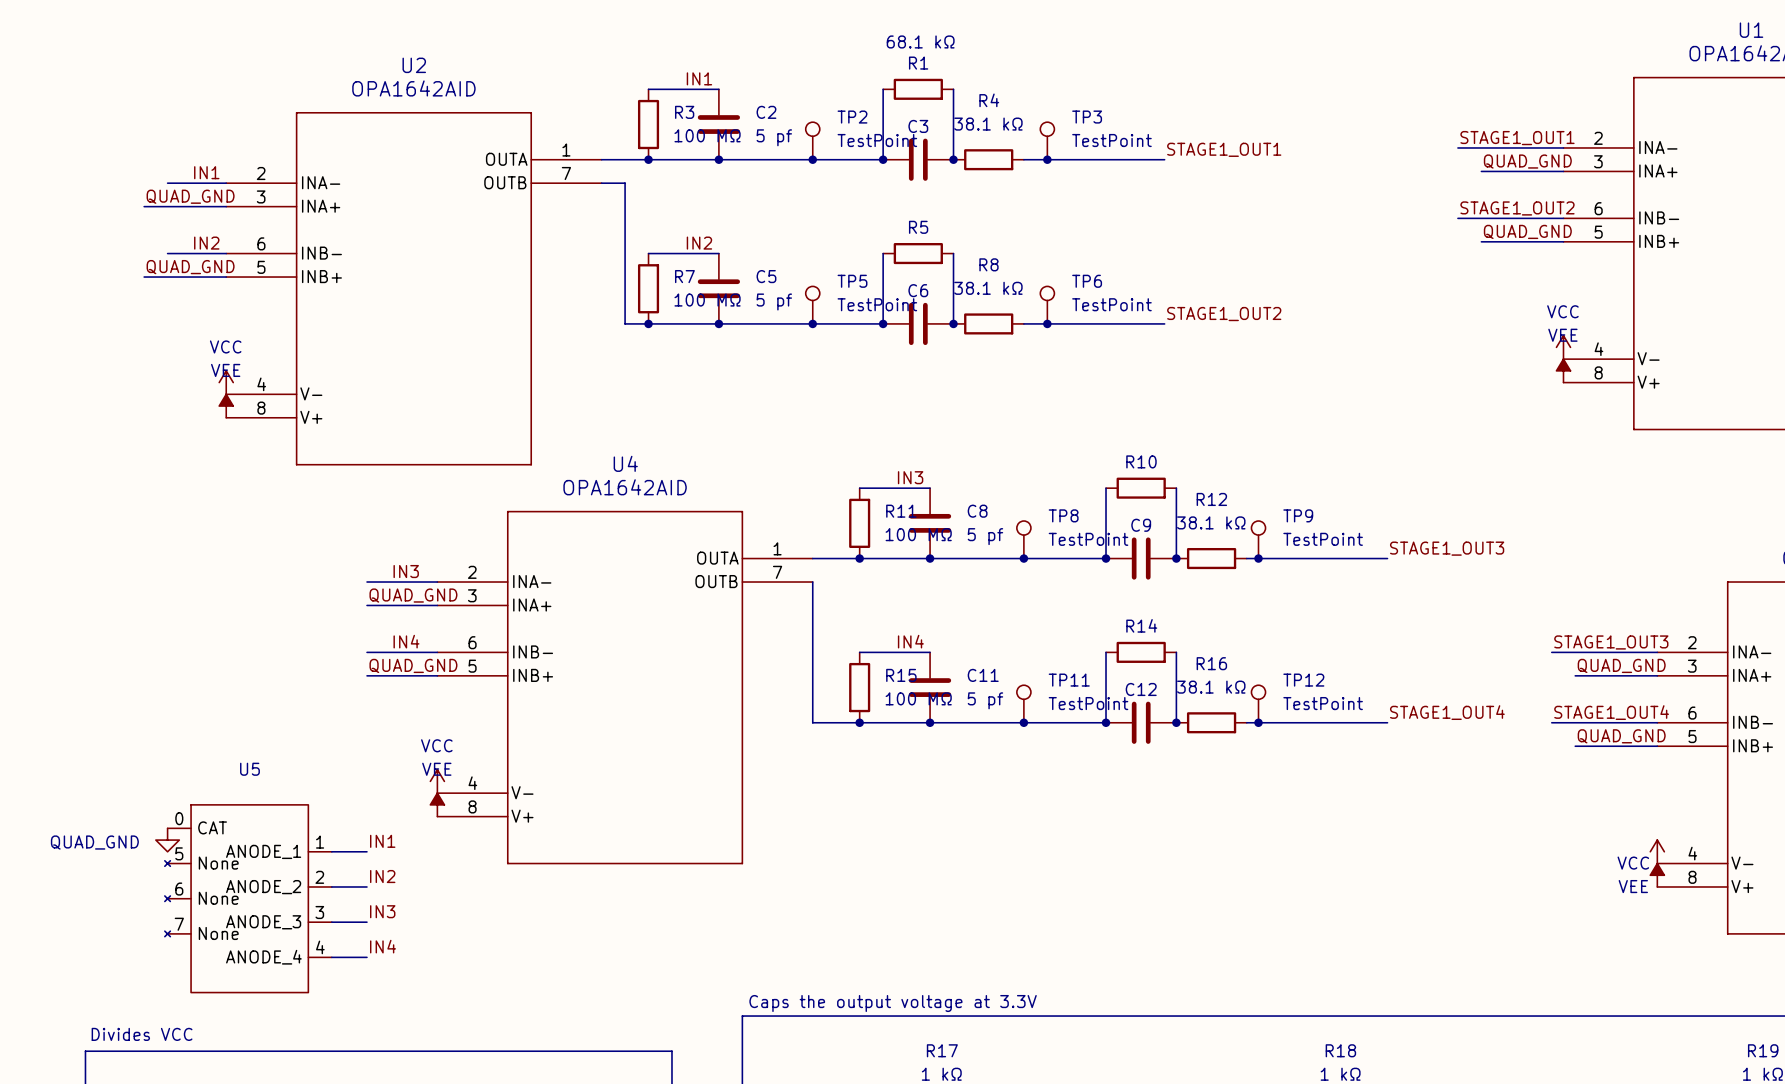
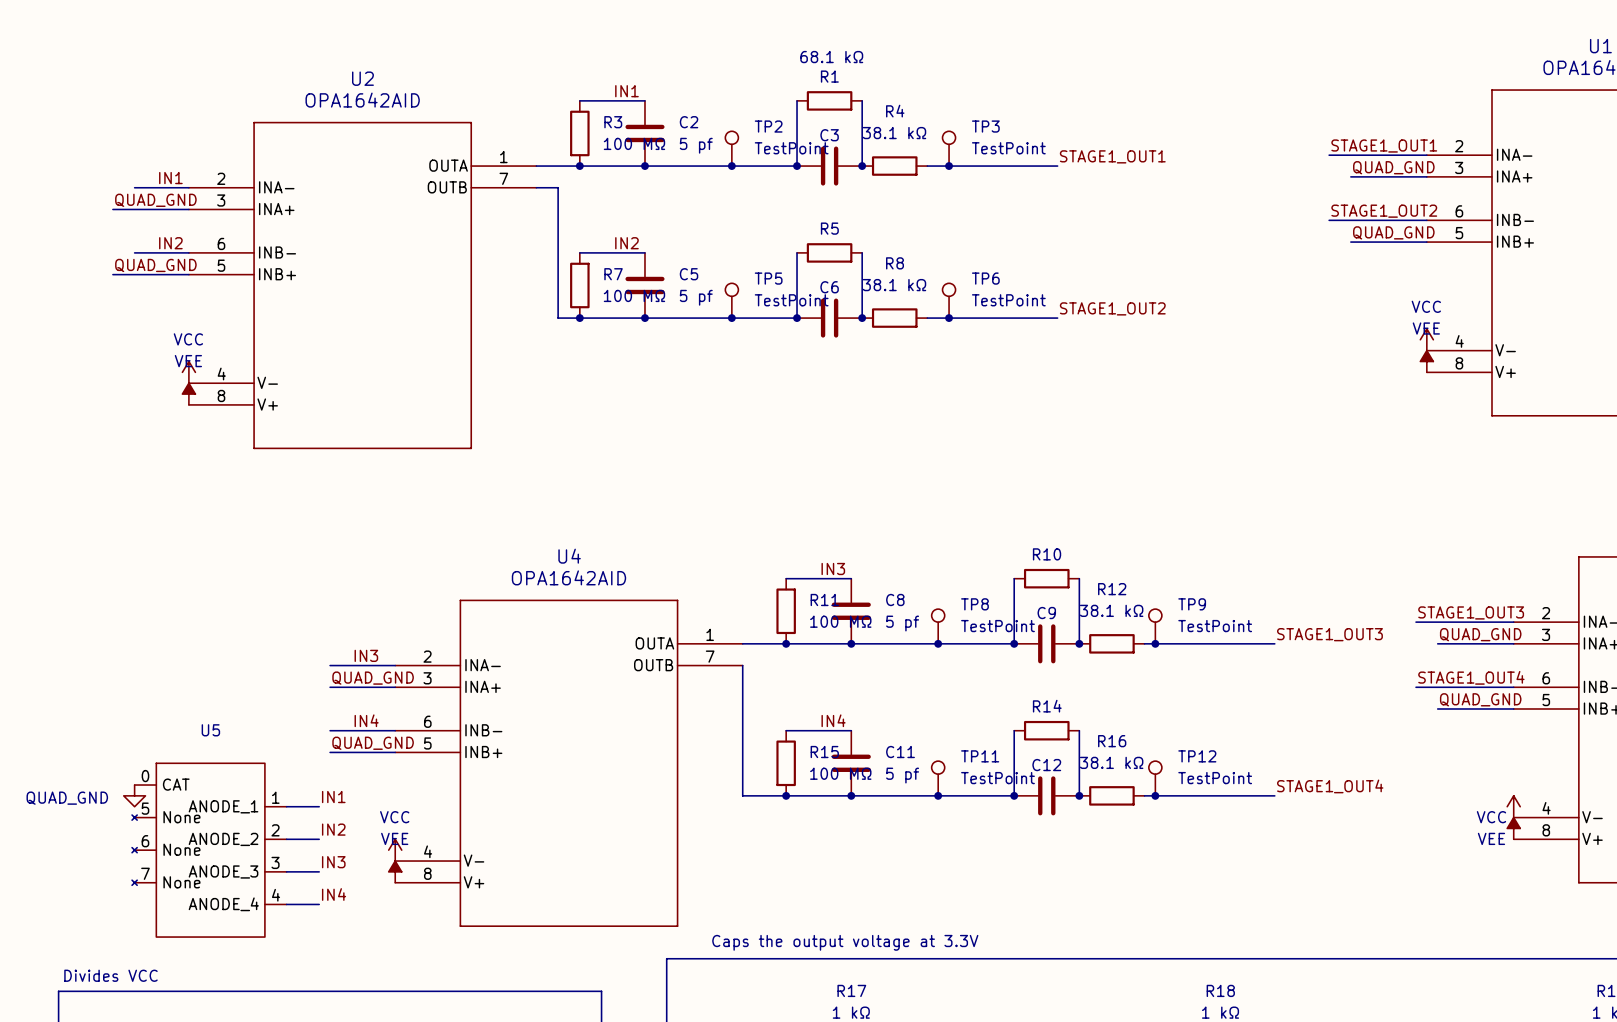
label position: IN3 (910, 477) -> IN3 (833, 568)
wire: (859, 488) (930, 488) -> (786, 578) (851, 578)
wire: (1106, 488) (1106, 558) (812, 558) -> (1014, 578) (1014, 643) (742, 643)
R10 position: (1141, 488) -> (1046, 578)
wire: (1176, 488) (1176, 558) -> (1079, 578) (1079, 643)
R11 position: (859, 523) -> (786, 611)
C8 position: (930, 523) -> (851, 611)
TP8 position: (1023, 539) -> (938, 626)
TP9 position: (1258, 539) -> (1155, 626)
label position: STAGE1_OUT3 (1447, 548) -> STAGE1_OUT3 (1329, 634)
junction: (859, 558) -> none
junction: (930, 558) -> none
junction: (1023, 558) -> none
junction: (1106, 558) -> none
C9 position: (1141, 558) -> (1046, 643)
junction: (1176, 558) -> none
R12 position: (1211, 558) -> (1111, 643)
wire: (1246, 558) (1387, 558) -> (1144, 643) (1274, 643)
junction: (1258, 558) -> none
label position: IN3 (406, 571) -> IN3 (366, 655)
wire: (367, 582) (437, 582) -> (330, 665) (395, 665)
wire: (812, 582) (812, 722) (1106, 722) (1106, 652) -> (742, 665) (742, 795) (1014, 795) (1014, 730)
label: QUAD_GND (413, 595) -> none
wire: (367, 605) (437, 605) -> (330, 687) (395, 687)
label position: IN4 (406, 641) -> IN4 (366, 720)
label position: IN4 (910, 641) -> IN4 (833, 720)
wire: (367, 652) (437, 652) -> (330, 730) (395, 730)
wire: (859, 652) (930, 652) -> (786, 730) (851, 730)
R14 position: (1141, 652) -> (1046, 730)
wire: (1176, 652) (1176, 722) -> (1079, 730) (1079, 795)
label position: QUAD_GND (413, 665) -> QUAD_GND (373, 678)
wire: (367, 675) (437, 675) -> (330, 752) (395, 752)
junction: none -> (786, 643)
junction: none -> (851, 643)
junction: none -> (938, 643)
junction: none -> (1014, 643)
junction: none -> (1079, 643)
junction: none -> (1155, 643)
U4 position: (625, 687) -> (568, 763)
R15 position: (859, 687) -> (786, 763)
C11 position: (930, 687) -> (851, 763)
TP11 position: (1023, 704) -> (938, 778)
TP12 position: (1258, 704) -> (1155, 778)
label position: STAGE1_OUT4 (1447, 712) -> STAGE1_OUT4 (1330, 786)
junction: (859, 722) -> none
junction: (930, 722) -> none
junction: (1023, 722) -> none
junction: (1106, 722) -> none
C12 position: (1141, 722) -> (1046, 795)
junction: (1176, 722) -> none
R16 position: (1211, 722) -> (1111, 795)
wire: (1246, 722) (1387, 722) -> (1144, 795) (1274, 795)
junction: (1258, 722) -> none
power symbol position: VCC (437, 781) -> VCC (395, 850)
label: none -> QUAD_GND (373, 743)
power symbol position: VEE (437, 804) -> VEE (395, 871)
junction: none -> (786, 795)
junction: none -> (851, 795)
junction: none -> (938, 795)
junction: none -> (1014, 795)
junction: none -> (1079, 795)
junction: none -> (1155, 795)
text position: Caps the output voltage at 3.3V (893, 1003) -> Caps the output voltage at 3.3V (845, 942)

